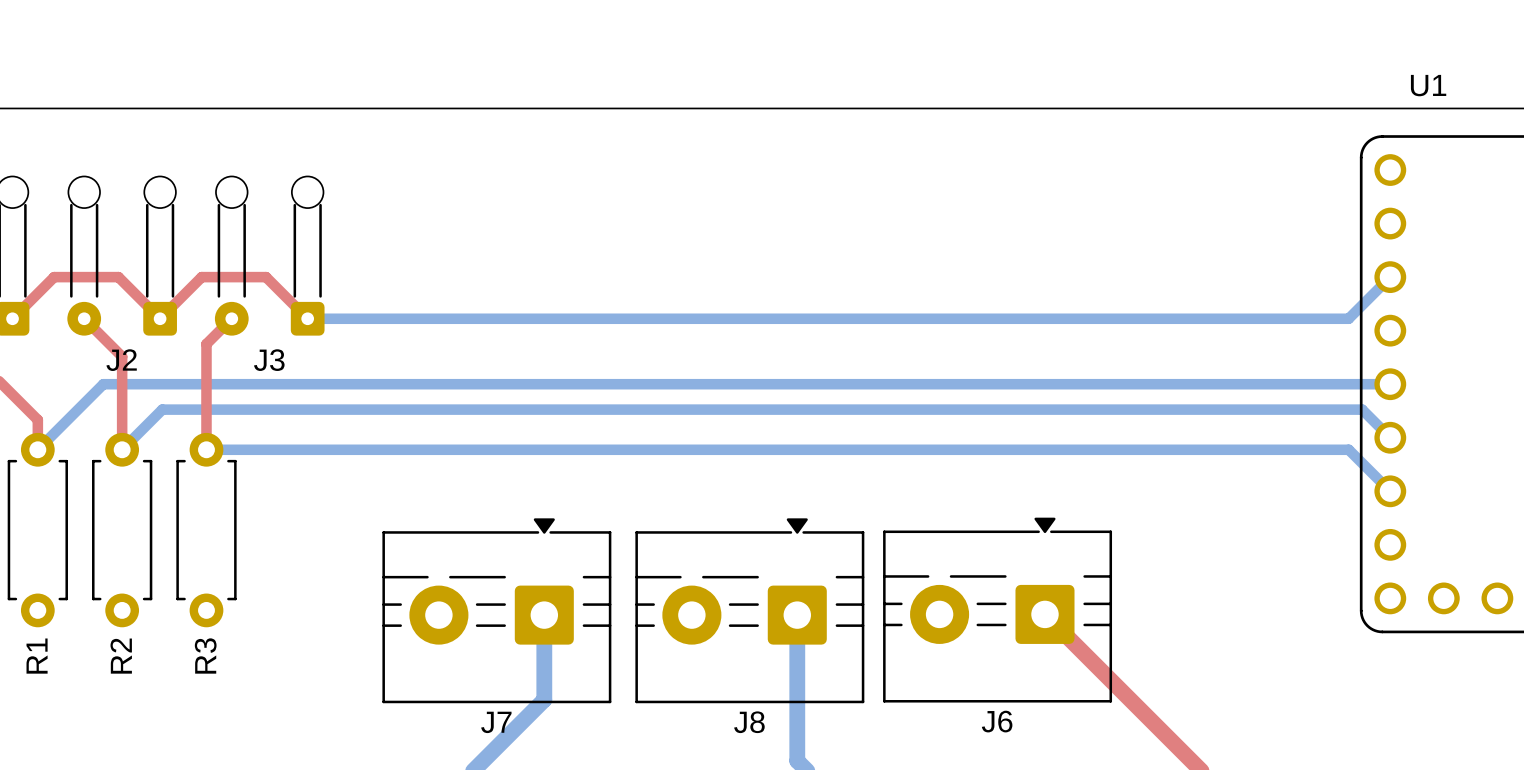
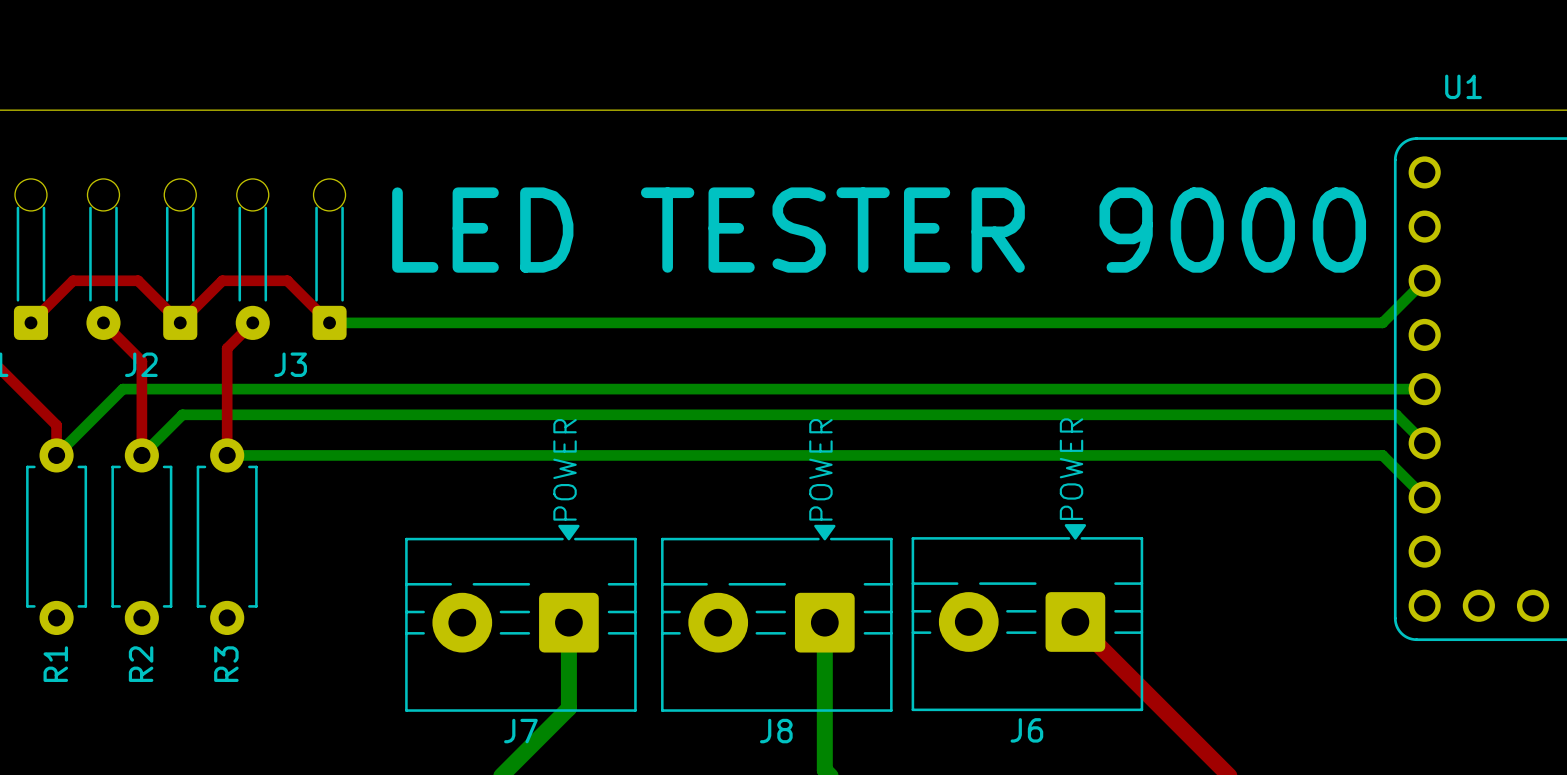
text: none -> LED TESTER 9000 (879, 230)
text: none -> POWER (1071, 469)
text: none -> POWER (565, 469)
text: none -> POWER (820, 469)

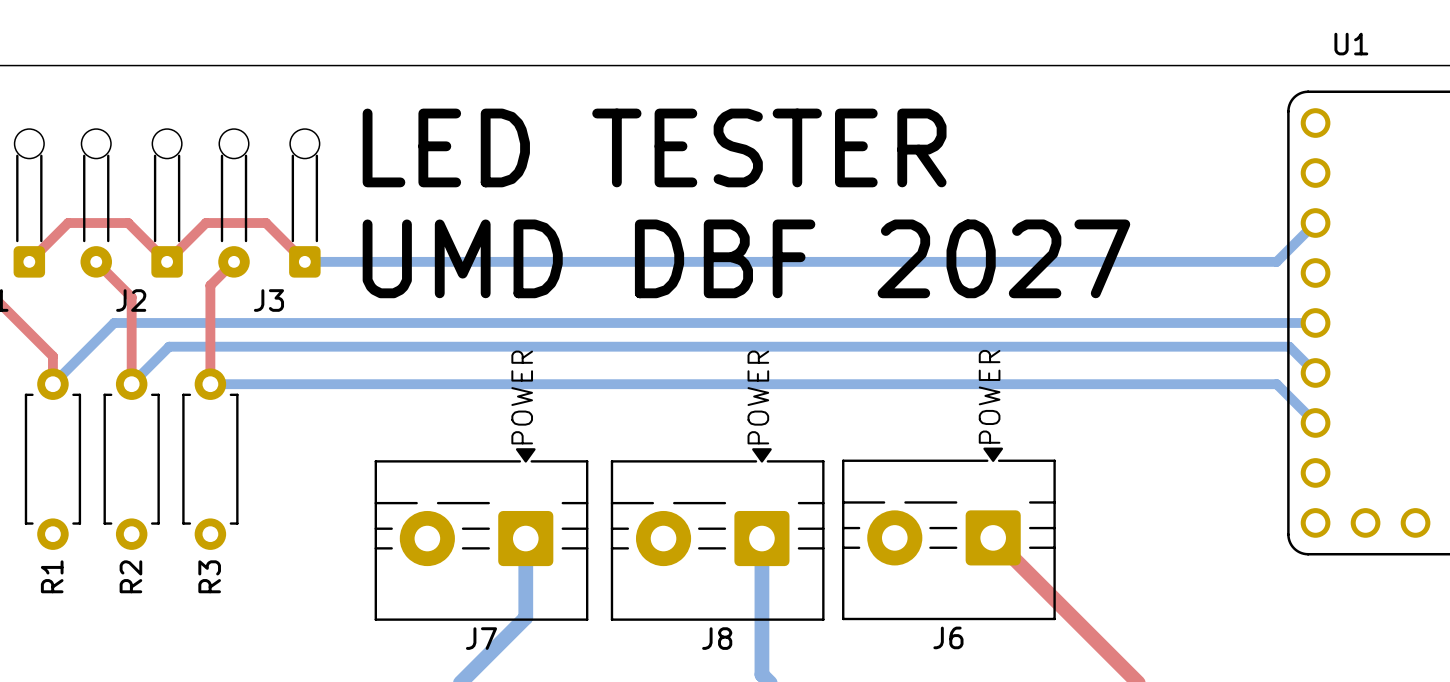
text: LED TESTER 9000 (879, 230) -> LED TESTER (654, 147)
text: none -> UMD DBF 2027 (746, 258)

